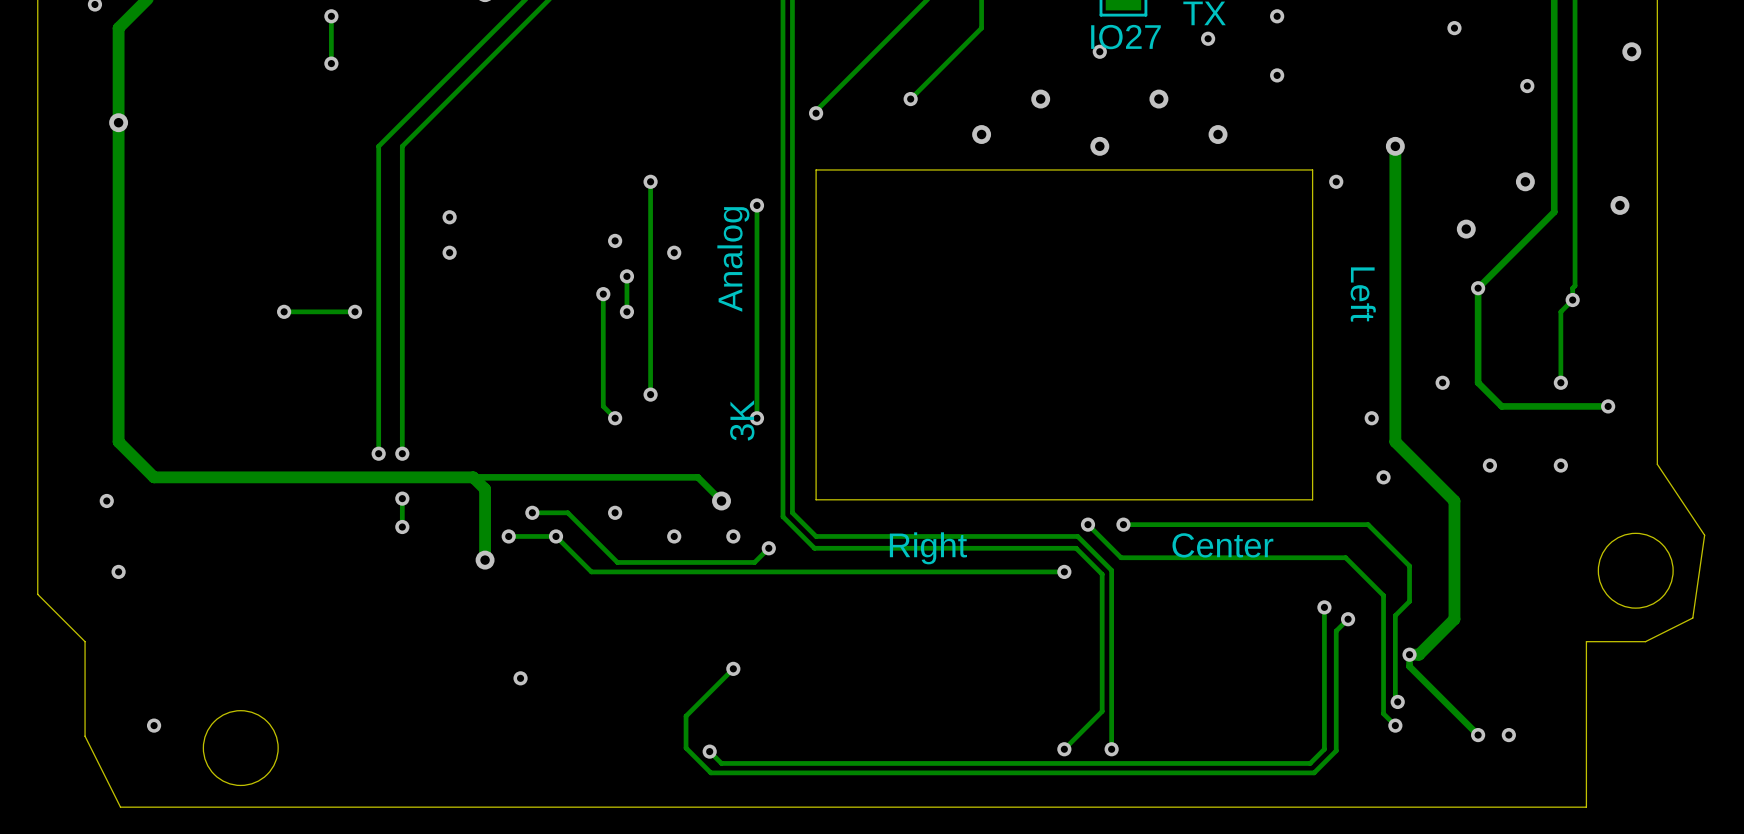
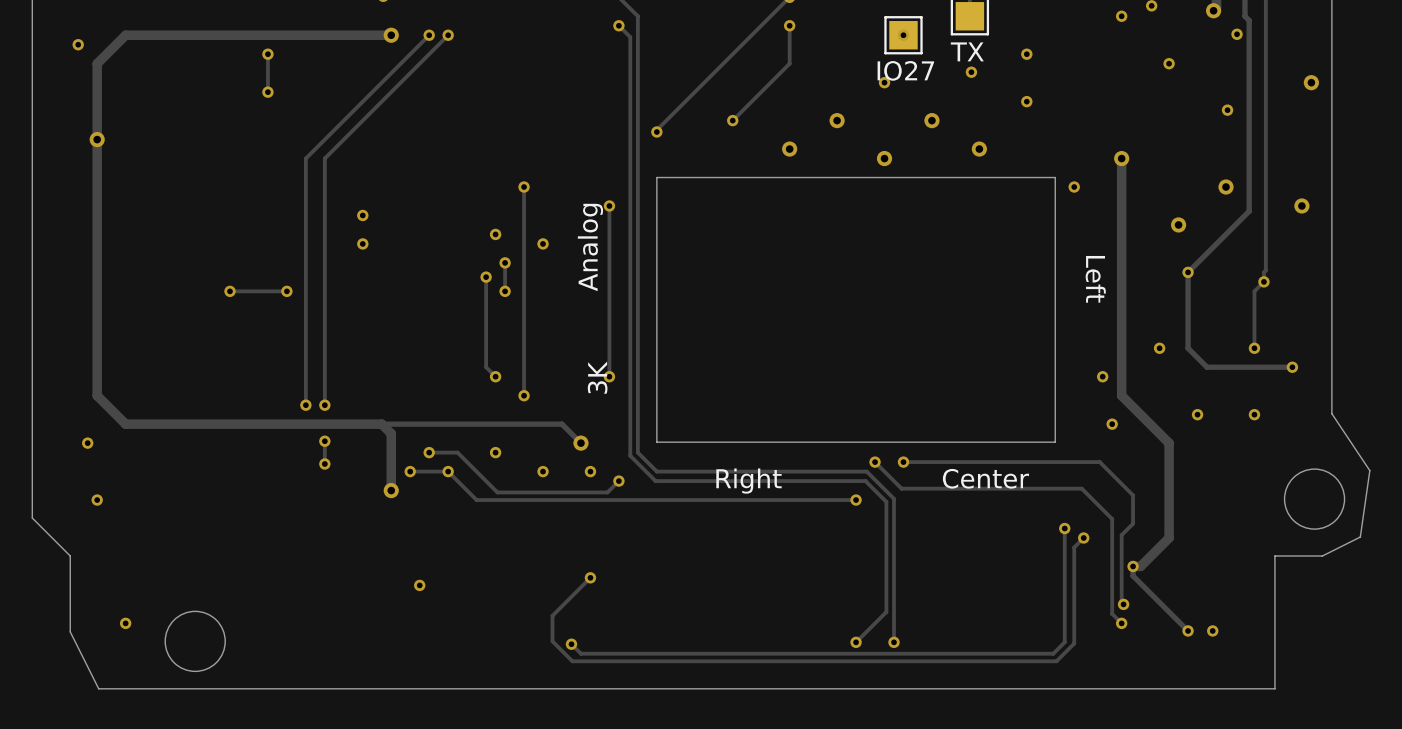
track: none -> (524, 357) (524, 395)
via position: (650, 394) -> (524, 395)

